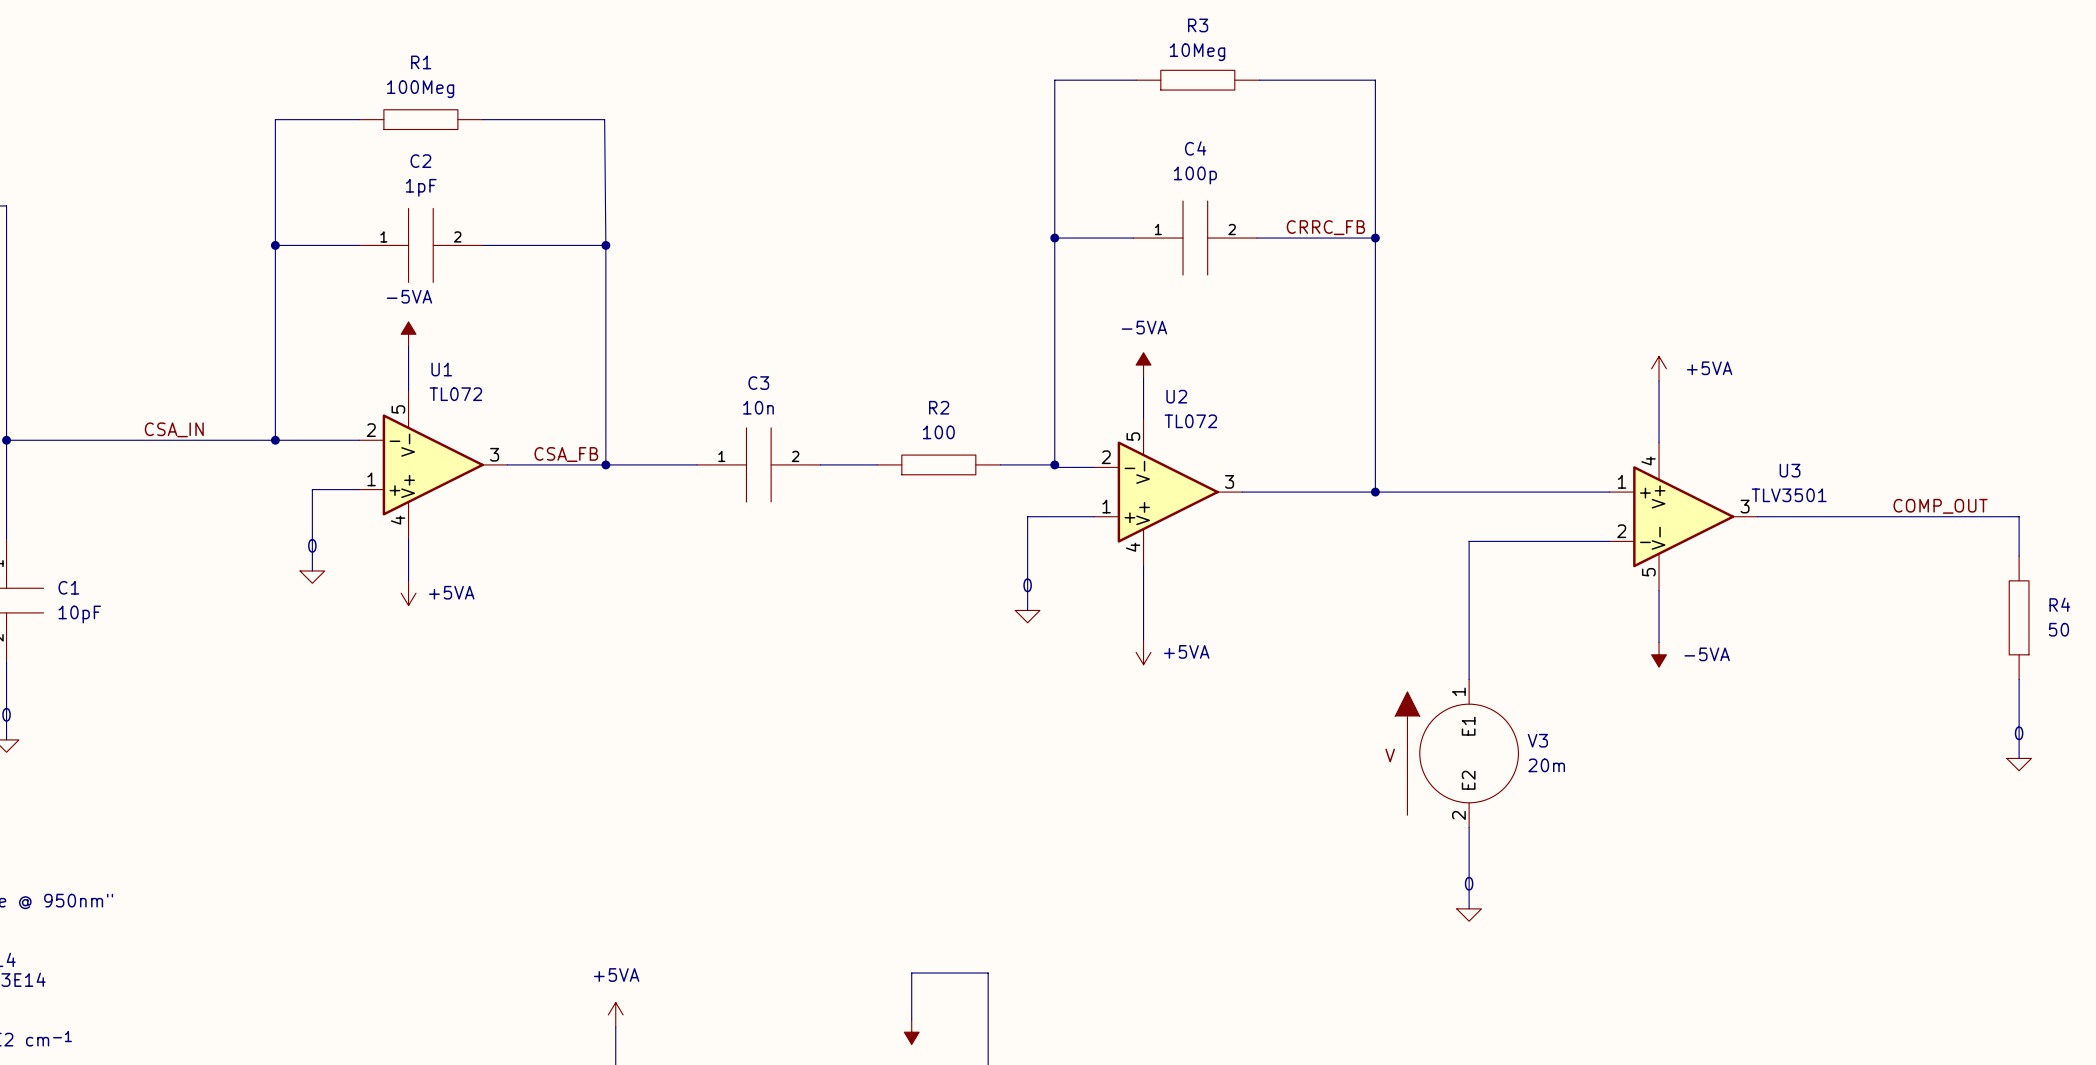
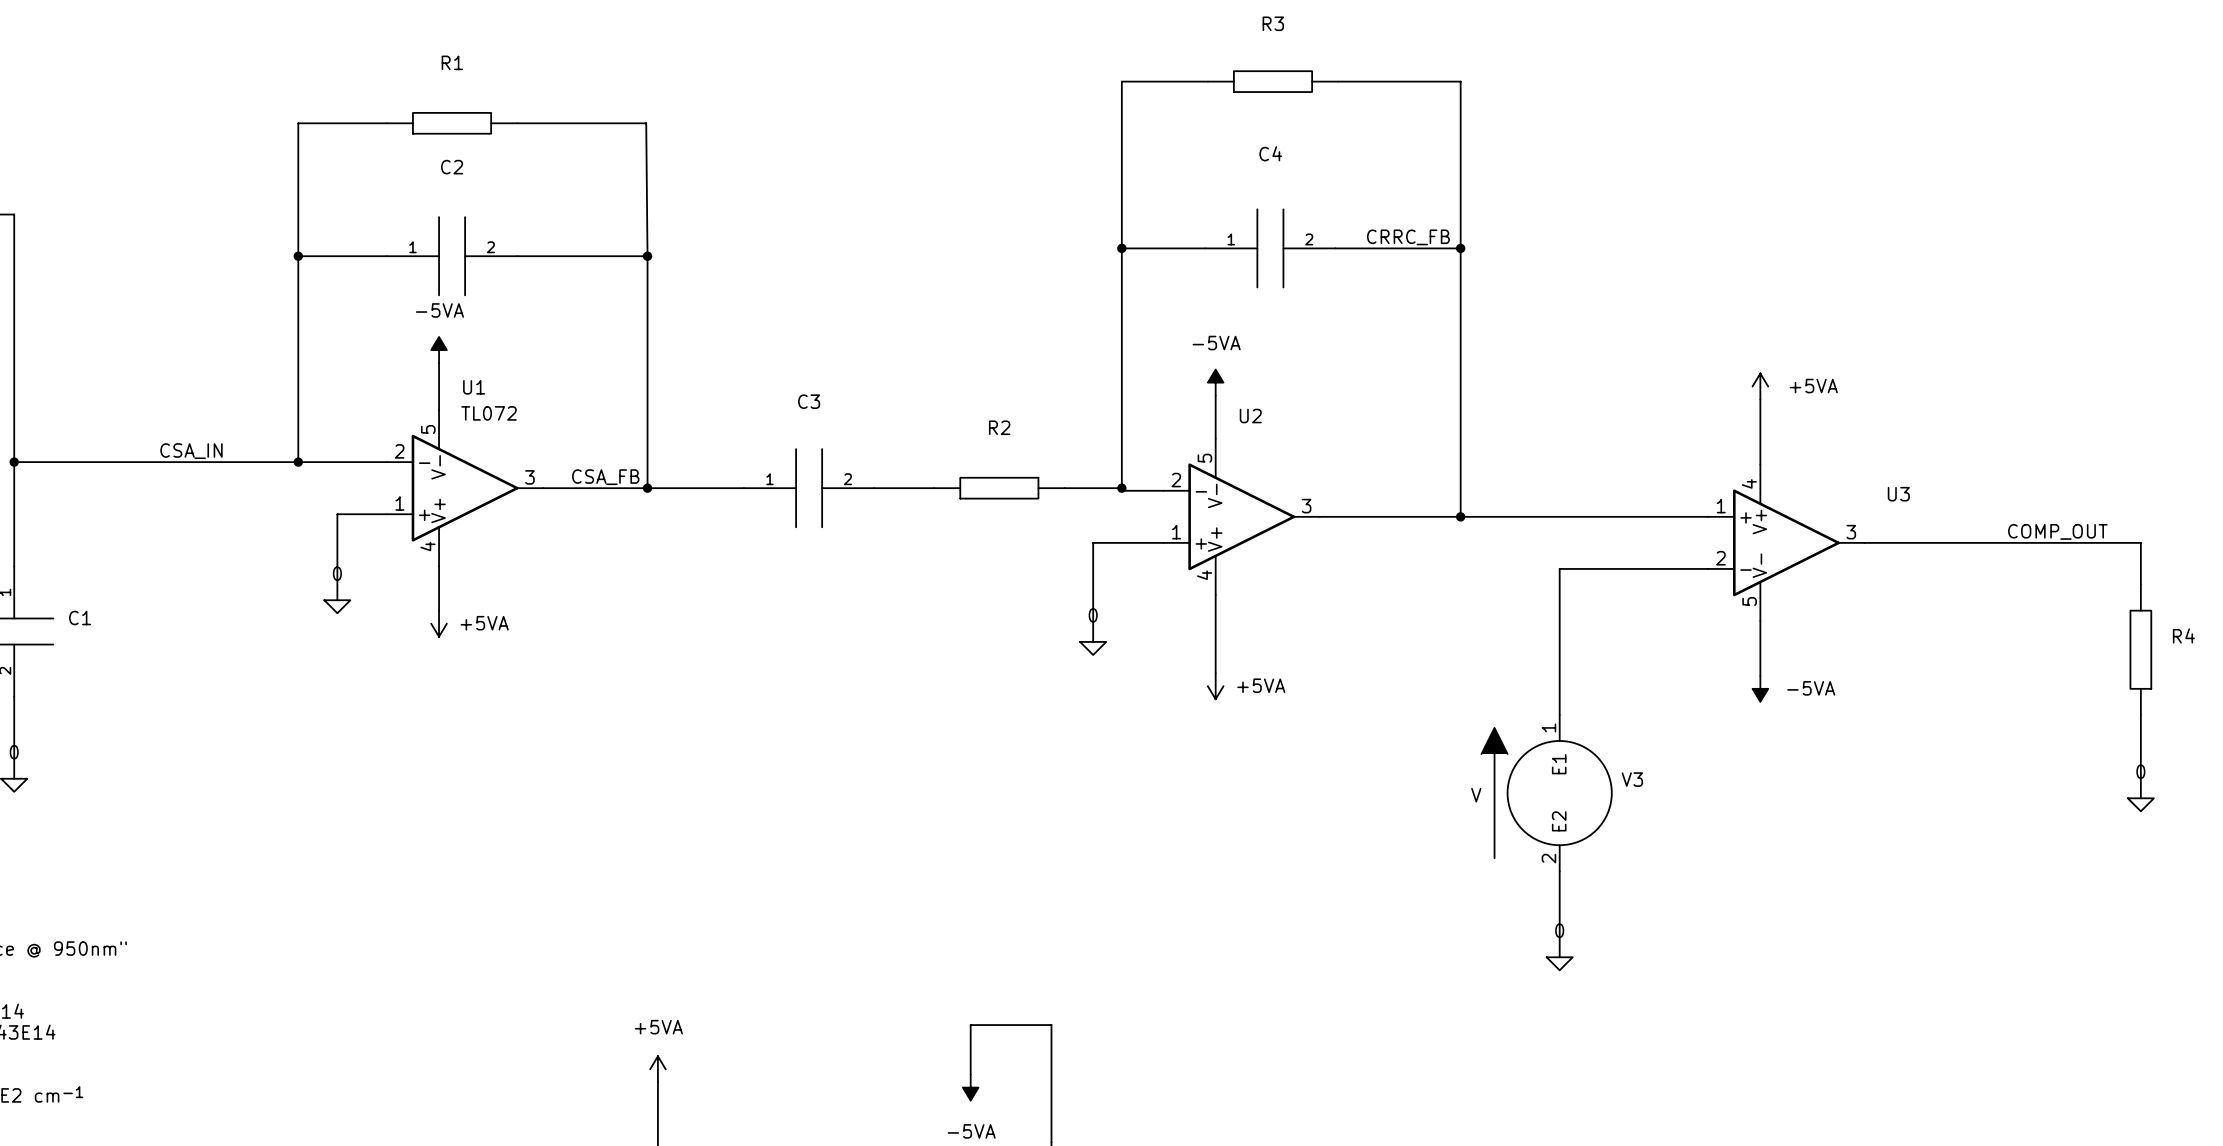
R3 value: 10Meg (1197, 52) -> none
R1 value: 100Meg (420, 89) -> none
C4 value: 100p (1195, 175) -> none
C2 value: 1pF (421, 187) -> none
C3 value: 10n (758, 407) -> none
U2 value: TL072 (1190, 421) -> none
R2 value: 100 (938, 432) -> none
U3 value: TLV3501 (1789, 495) -> none
C1 value: 10pF (79, 614) -> none
R4 value: 50 (2058, 629) -> none
V3 value: 20m (1546, 765) -> none

